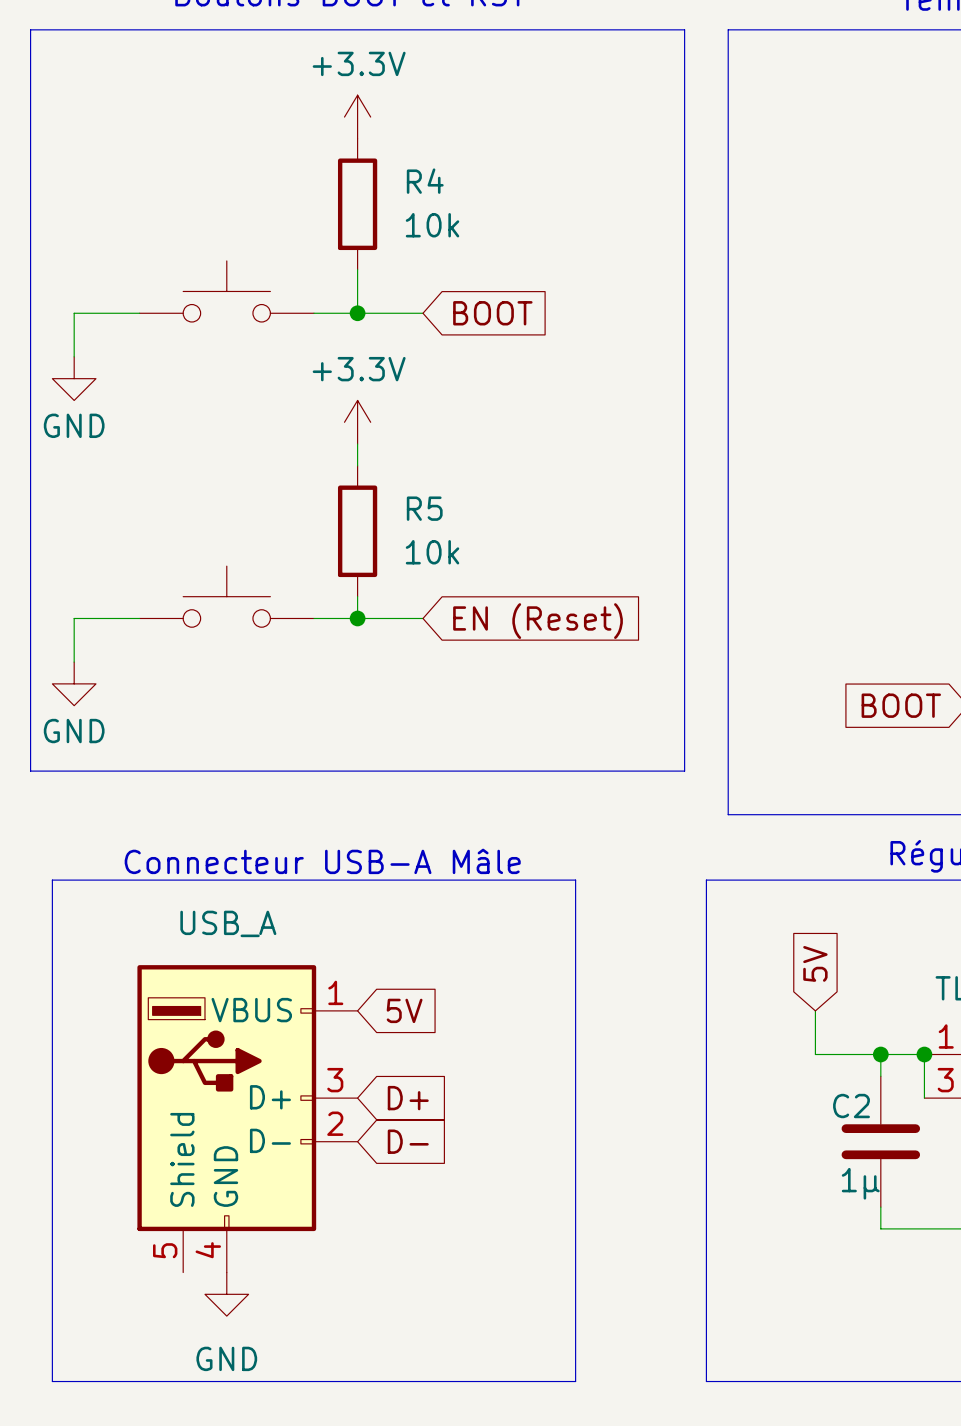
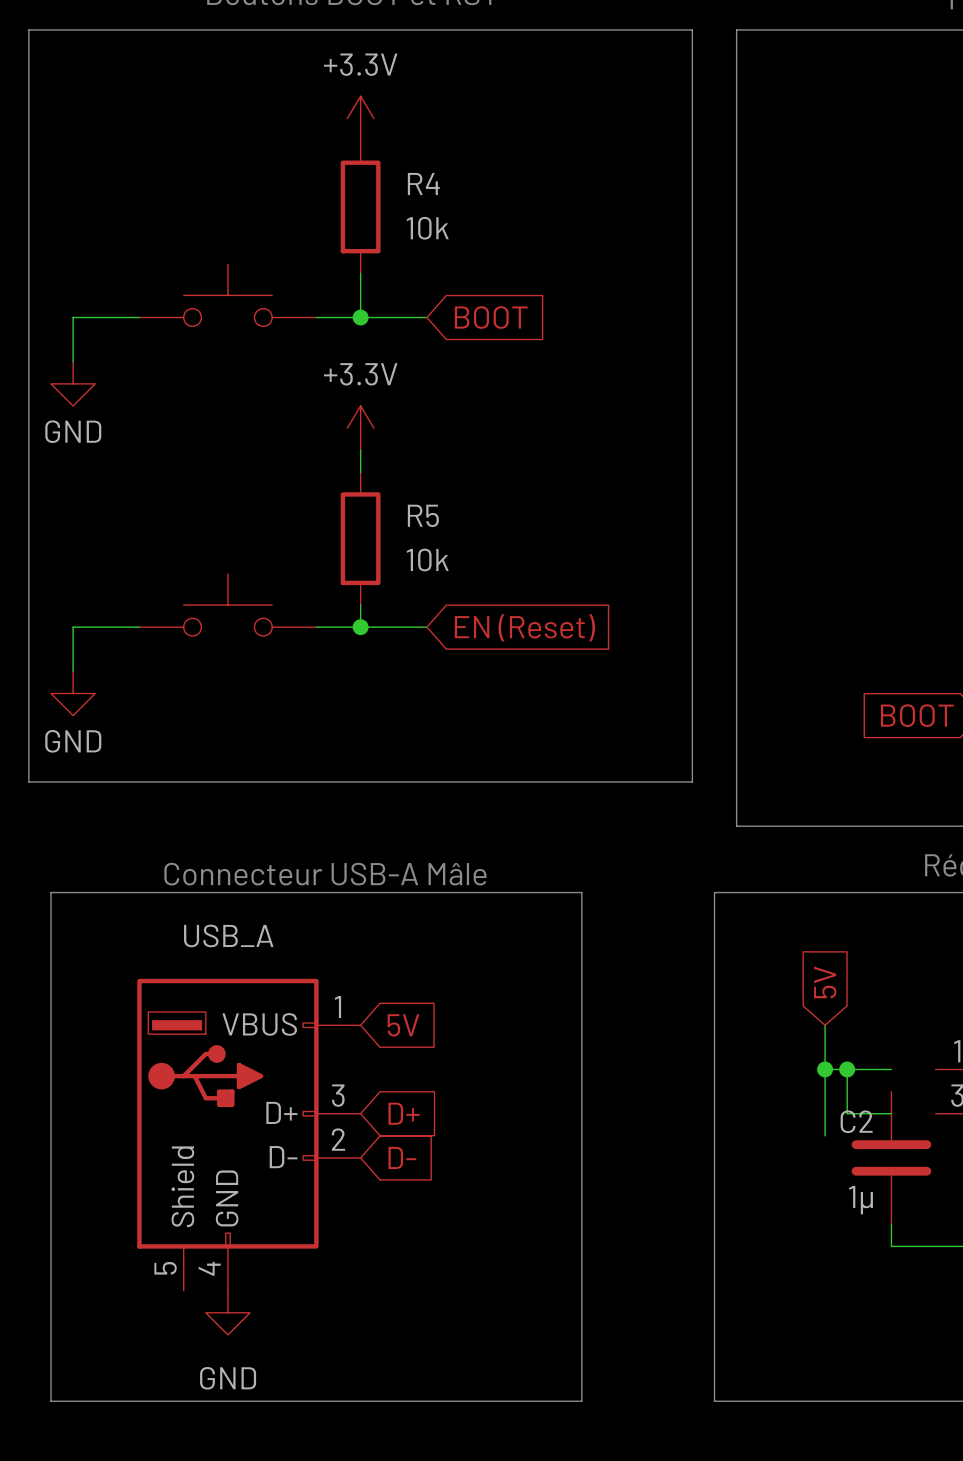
wire: none -> (825, 1069) (825, 1135)
junction: none -> (825, 1069)
wire: none -> (847, 1069) (847, 1113) (891, 1113)
junction: none -> (847, 1069)
junction: (880, 1054) -> none
junction: (924, 1054) -> none
wire: (880, 1076) (880, 1054) (924, 1054) (924, 1098) -> none

